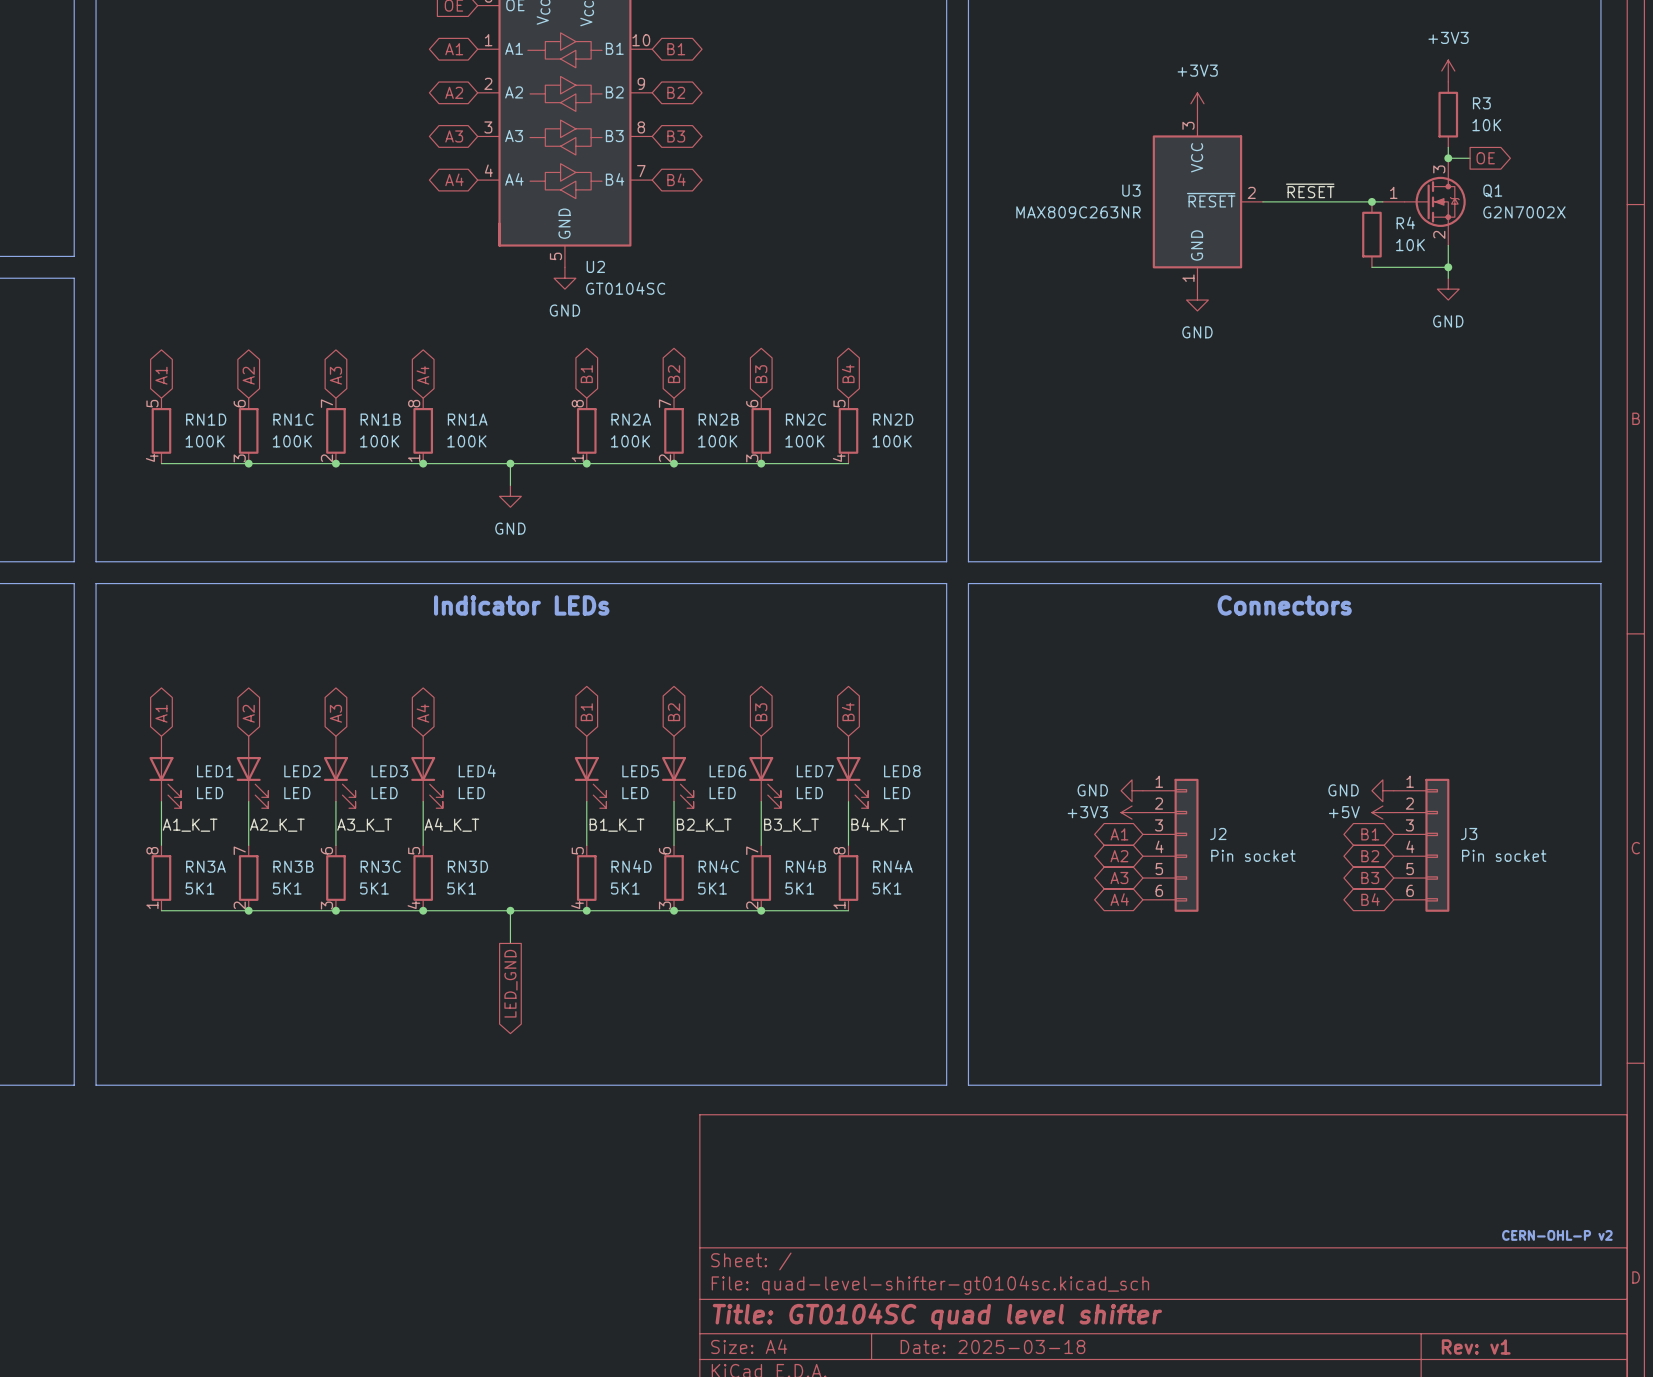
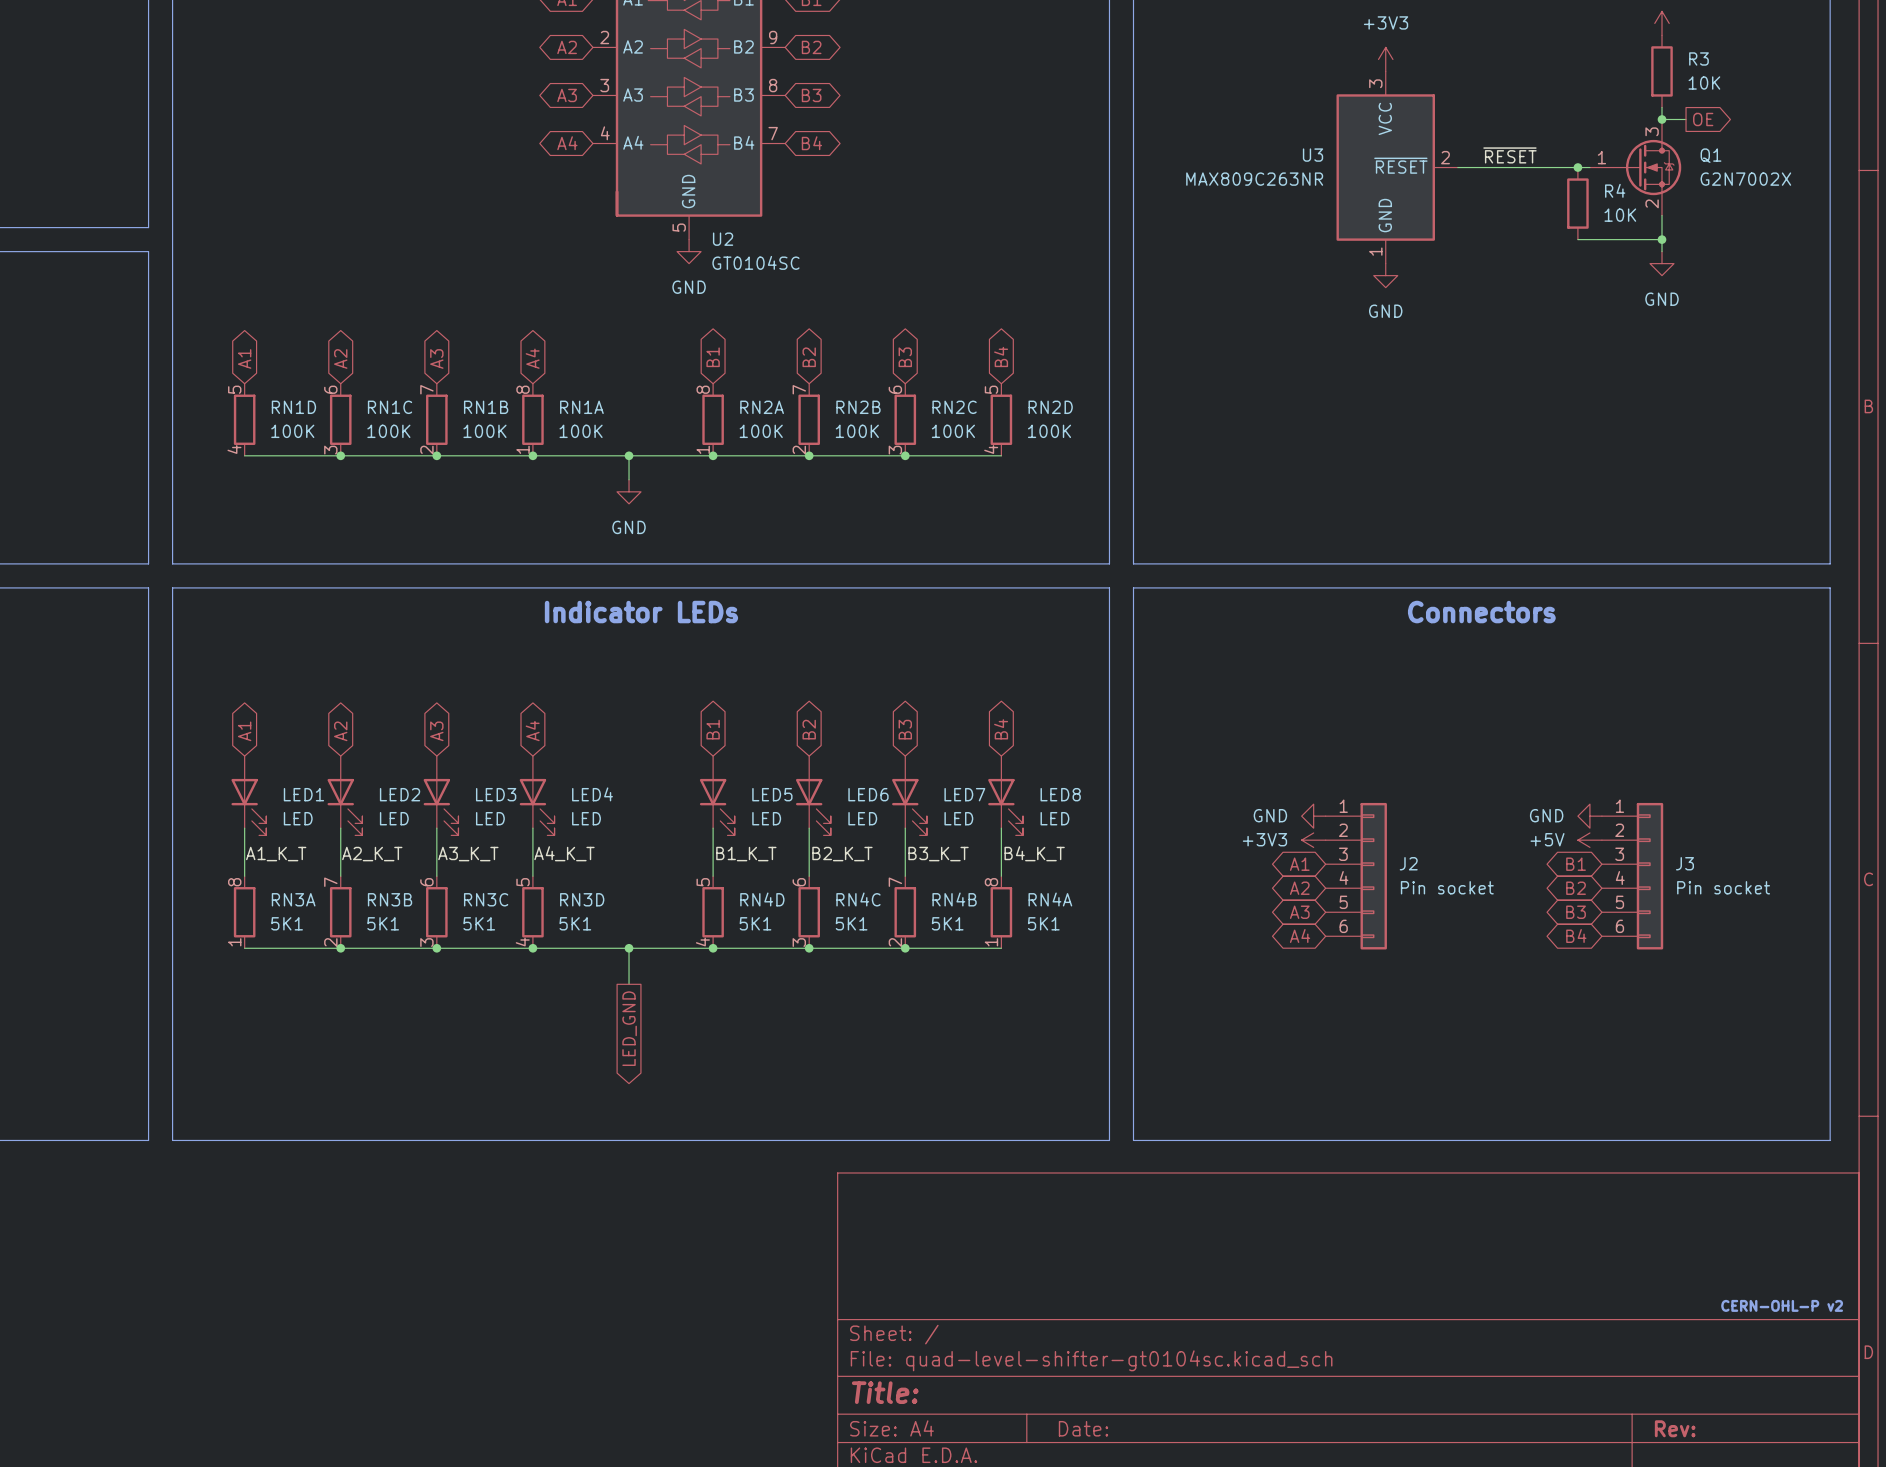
title block: Title: GT0104SC quad level shifter (937, 1316) -> Title: (885, 1392)
title block: Date: 2025-03-18 (992, 1346) -> Date: (1083, 1428)
title block: Rev: v1 (1476, 1346) -> Rev: (1675, 1428)

